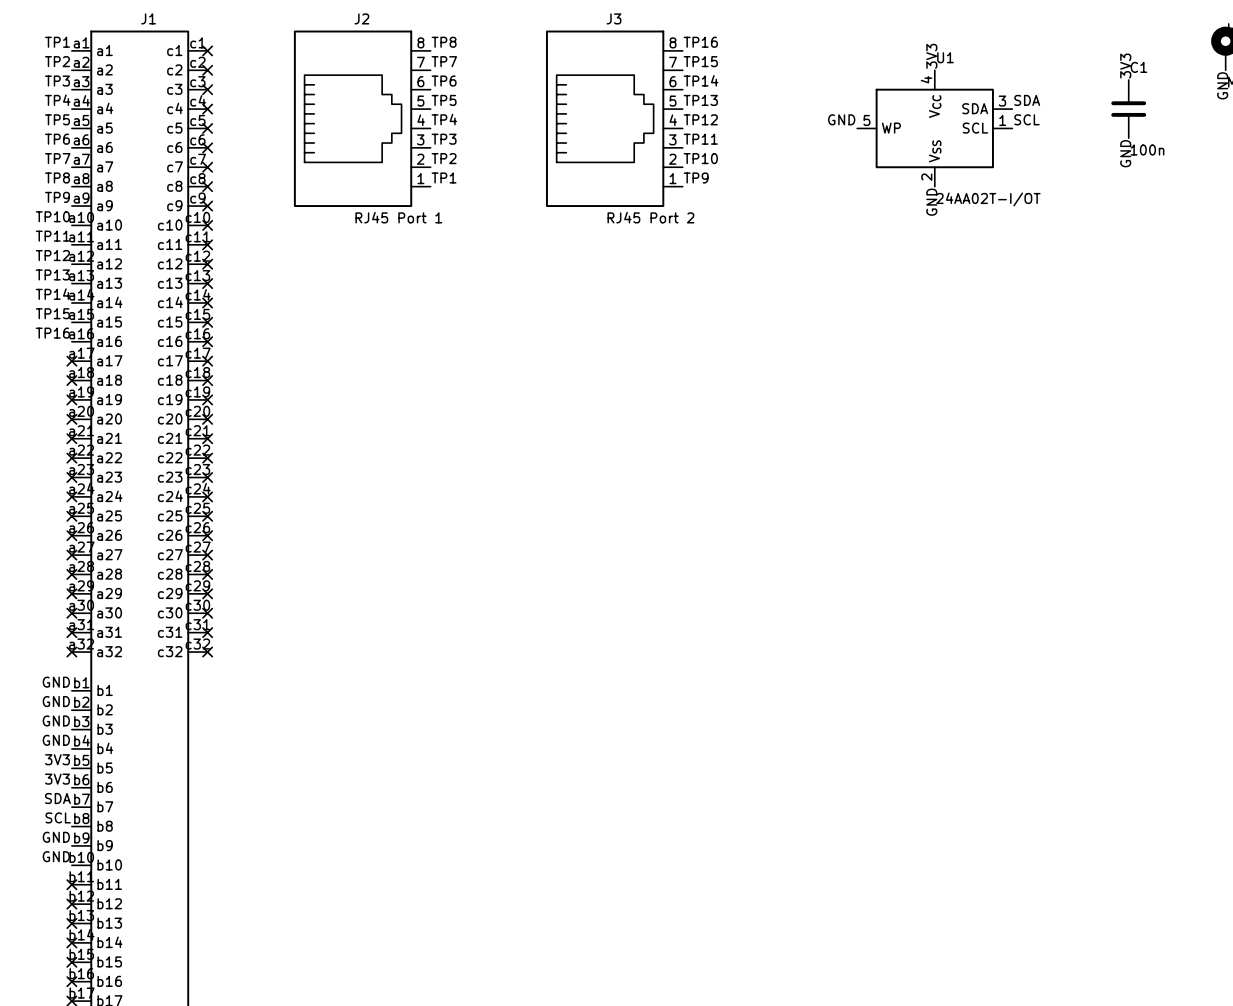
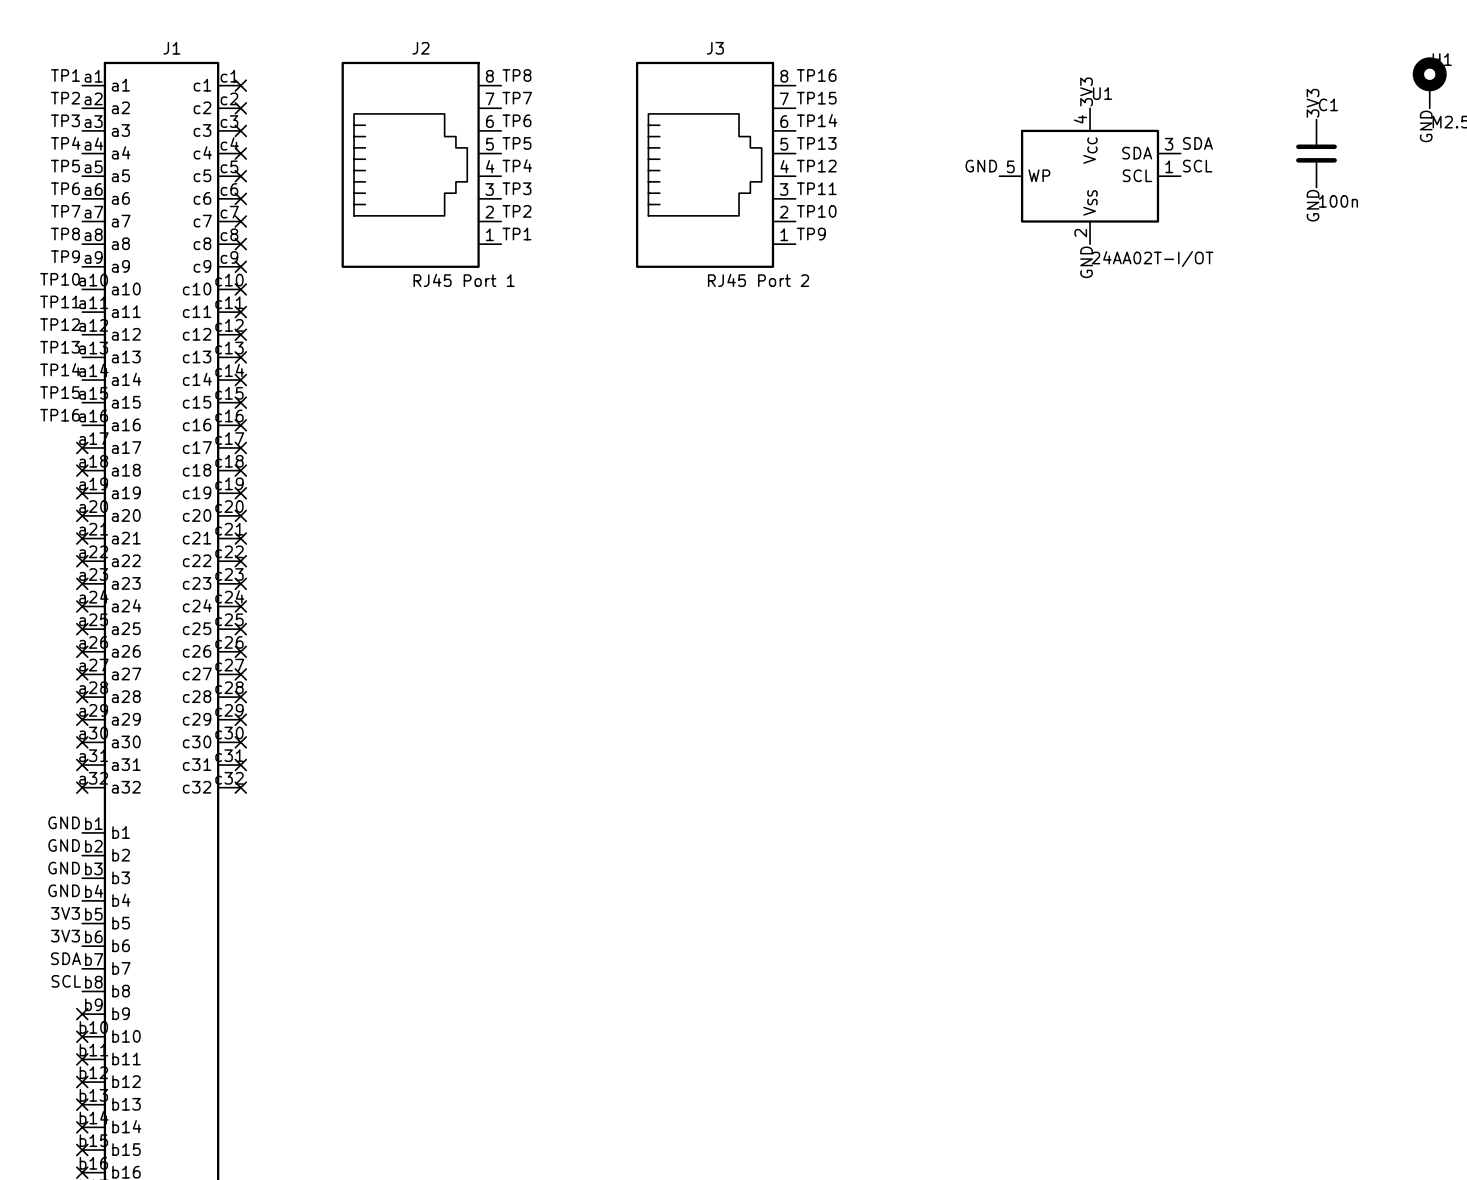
label: GND (56, 837) -> none
no-connect mark: none -> (82, 1014)
label: GND (56, 856) -> none
no-connect mark: none -> (82, 1036)

